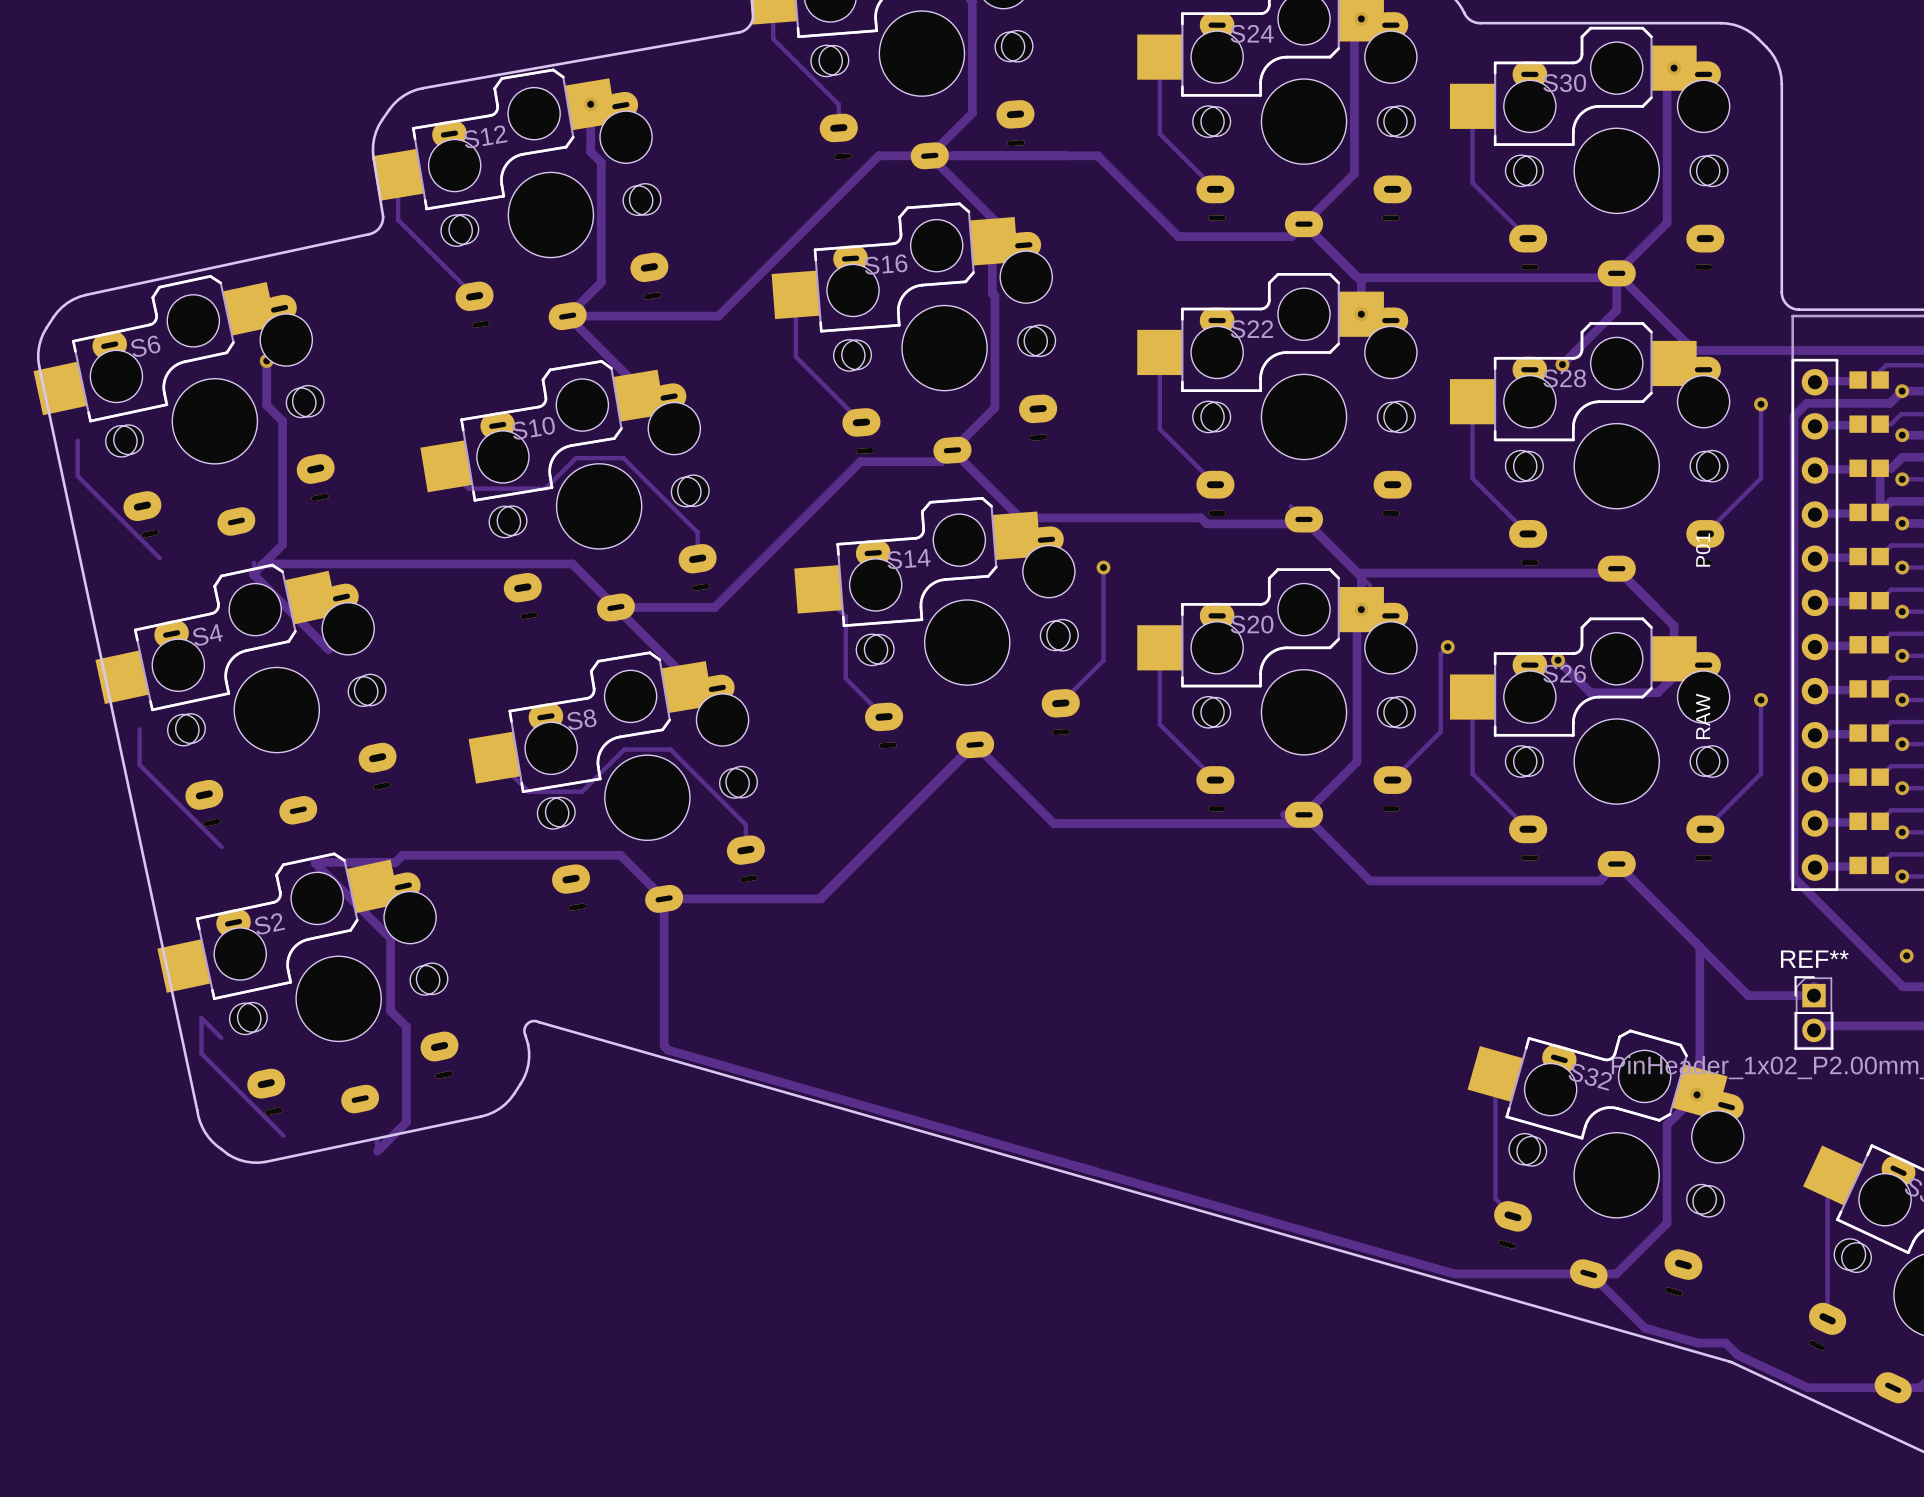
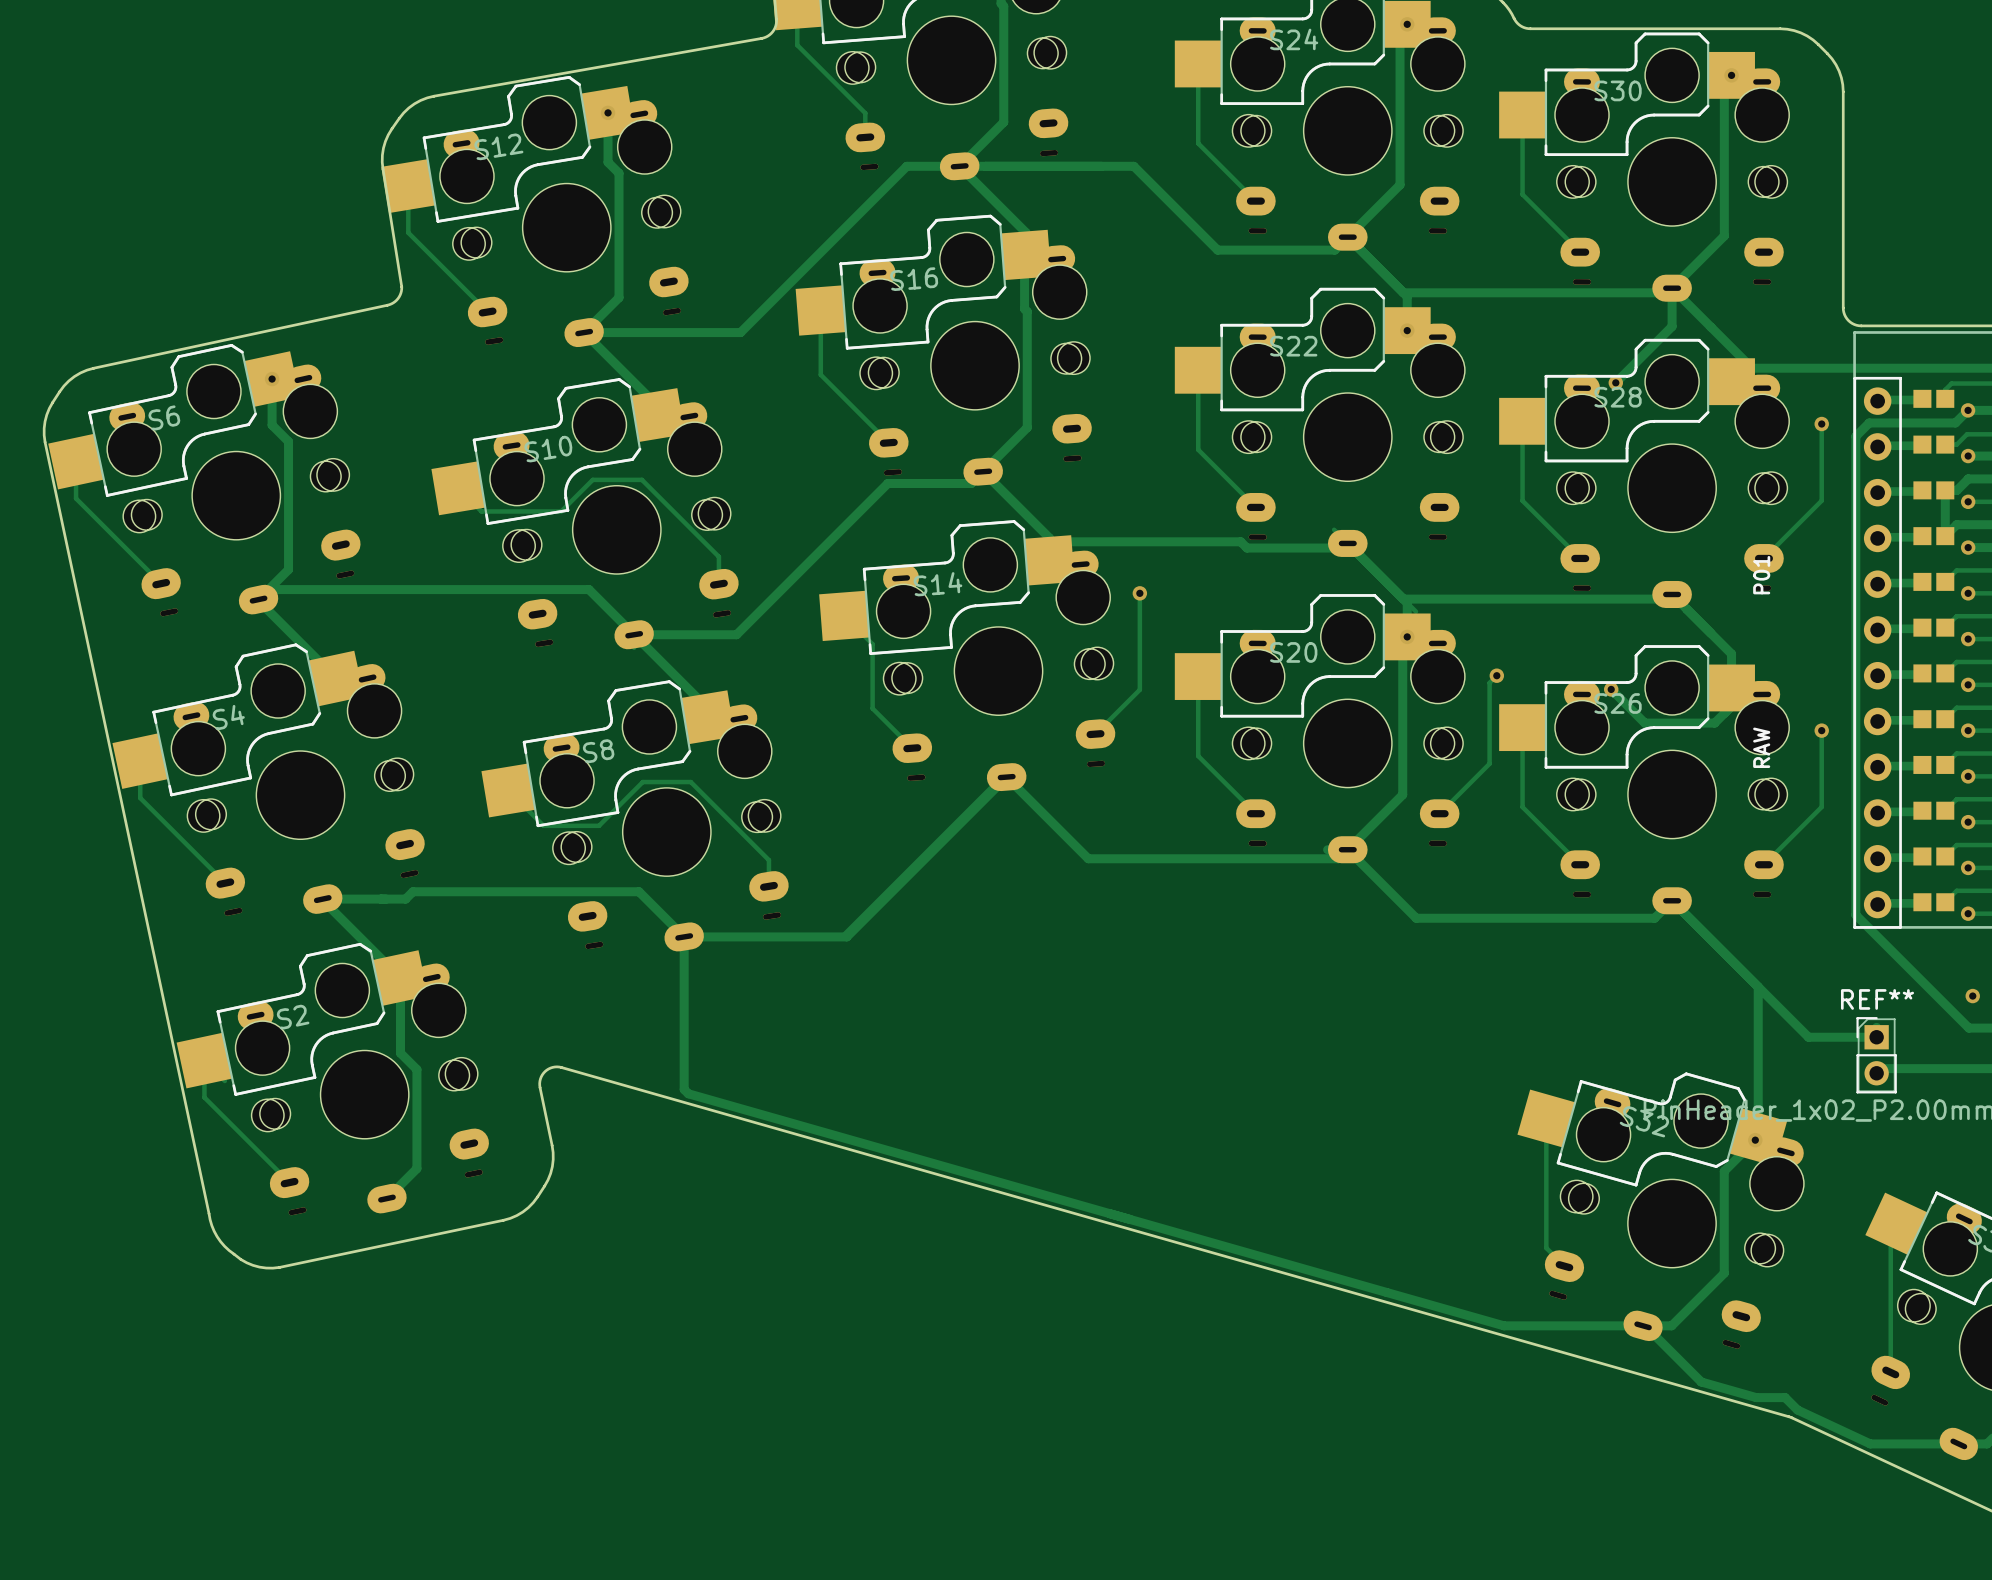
board edge: (373, 158) (383, 216) (380, 226) (373, 232) (79, 296) (62, 307) (46, 327) -> (383, 169) (401, 286) (399, 296) (393, 302) (87, 370) (68, 380) (52, 402)
board edge: (46, 327) (39, 346) (39, 366) (198, 1115) (208, 1137) (228, 1154) (245, 1161) (265, 1161) (481, 1116) (494, 1111) (510, 1099) (524, 1077) (529, 1057) (524, 1029) (528, 1023) (535, 1021) (1729, 1361) -> (52, 402) (45, 421) (45, 442) (210, 1219) (220, 1241) (240, 1259) (259, 1267) (279, 1267) (503, 1220) (522, 1211) (537, 1196) (548, 1179) (552, 1166) (552, 1145) (539, 1083) (541, 1076) (546, 1070) (559, 1067) (1789, 1416)
S6 position: (184, 406) -> (204, 480)
S4 position: (246, 695) -> (268, 779)
S2 position: (307, 983) -> (332, 1079)

